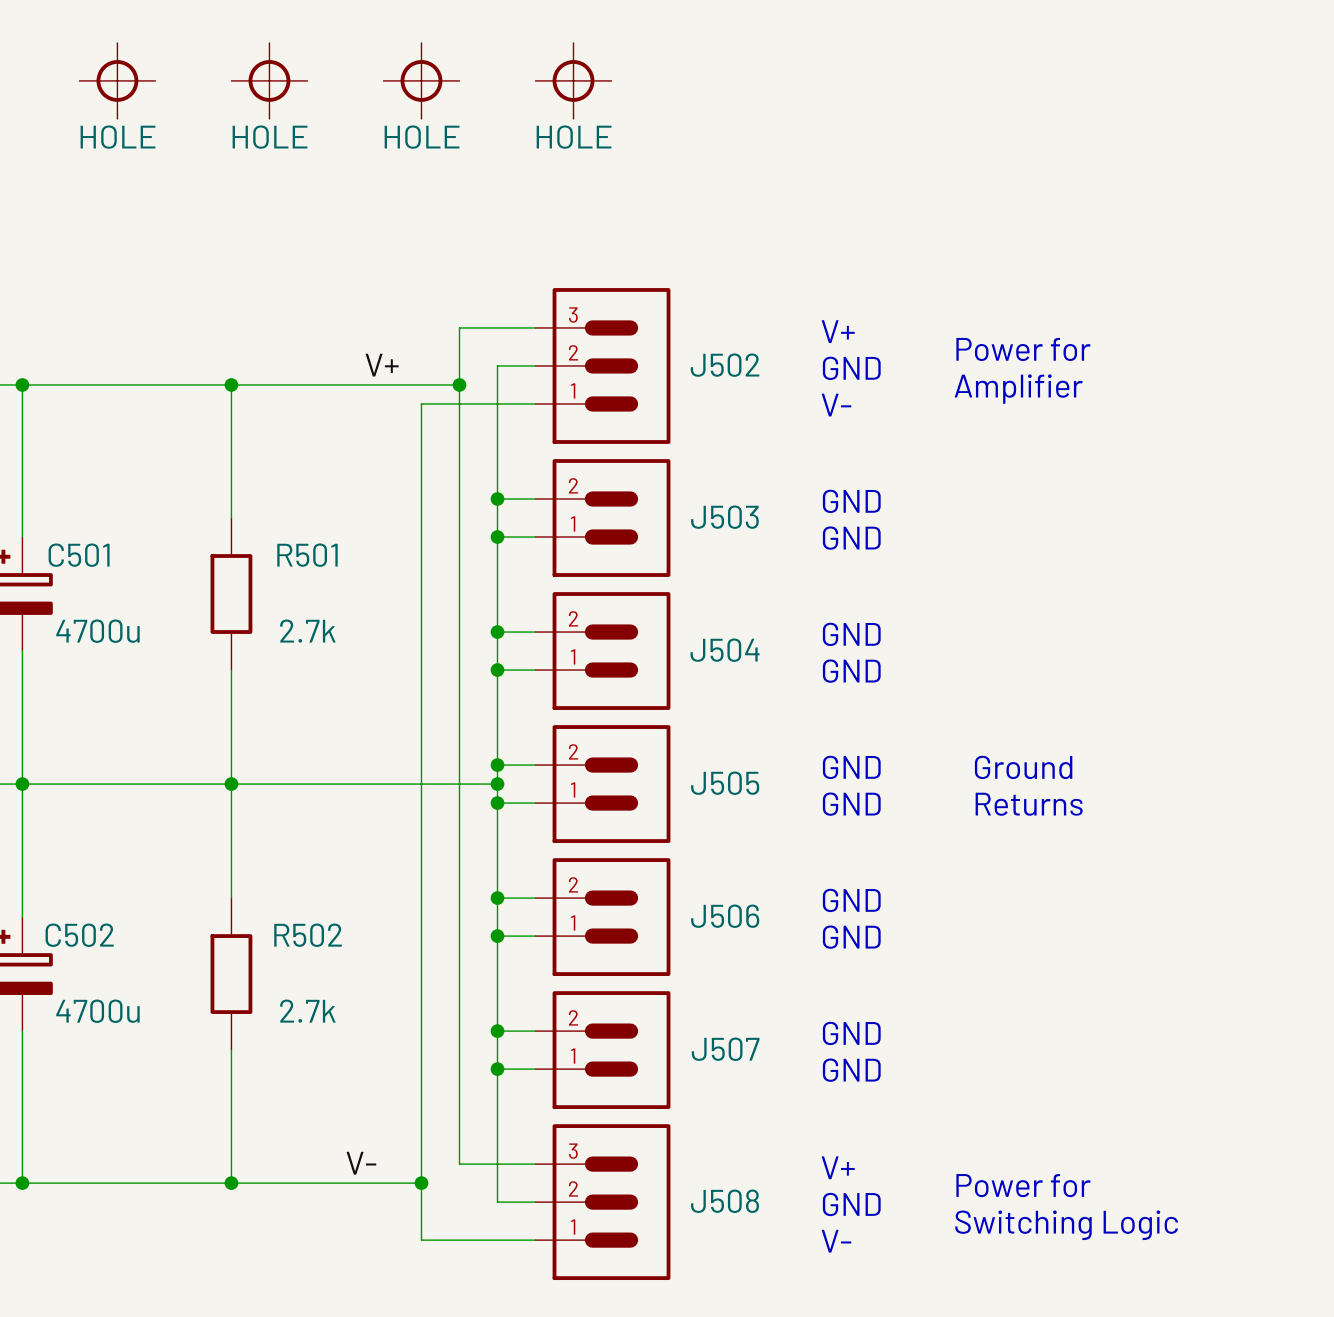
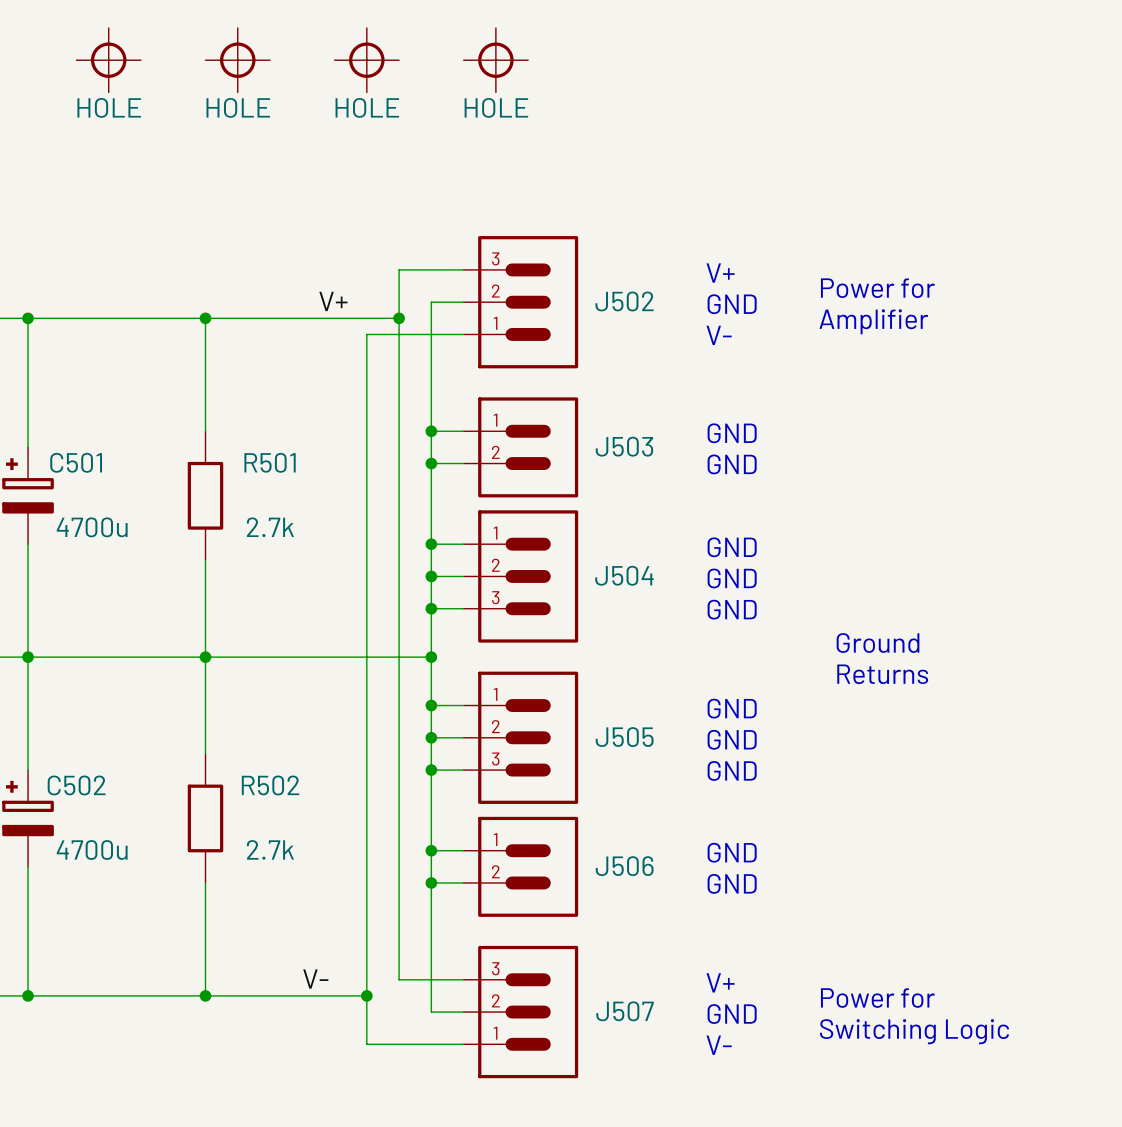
wire: (497, 499) (535, 499) -> (431, 431) (463, 431)
junction: (497, 499) -> none
text: GND (851, 501) -> none
junction: none -> (431, 431)
J503 flip: as is (611, 518) -> up-down (528, 447)
text: none -> GND (732, 433)
wire: (497, 537) (535, 537) -> (431, 463) (463, 463)
junction: (497, 537) -> none
text: GND (851, 538) -> none
junction: none -> (431, 463)
text: none -> GND (732, 464)
J504 symbol: [535, 592, 671, 710] -> [463, 510, 579, 643]
wire: (497, 632) (535, 632) -> (431, 544) (463, 544)
junction: (497, 632) -> none
text: GND (851, 634) -> none
junction: none -> (431, 544)
text: none -> GND (732, 547)
wire: (497, 670) (535, 670) -> (431, 576) (463, 576)
junction: (497, 670) -> none
text: GND (851, 671) -> none
junction: none -> (431, 576)
text: none -> GND (732, 578)
J505 symbol: [535, 725, 671, 843] -> [463, 671, 579, 804]
junction: none -> (431, 608)
wire: (497, 765) (535, 765) -> (431, 705) (463, 705)
junction: (497, 765) -> none
text position: GND (851, 767) -> GND (732, 609)
wire: (497, 803) (535, 803) -> (431, 608) (463, 608)
junction: (497, 803) -> none
text position: GND (851, 804) -> GND (732, 708)
junction: none -> (431, 705)
junction: none -> (431, 737)
text: none -> GND (732, 739)
wire: (497, 898) (535, 898) -> (431, 737) (463, 737)
junction: (497, 898) -> none
text: GND (851, 900) -> none
junction: none -> (431, 770)
J506 position: (602, 917) -> (520, 866)
J506 flip: as is (611, 917) -> up-down (528, 866)
text: none -> GND (732, 770)
wire: (497, 936) (535, 936) -> (431, 770) (463, 770)
junction: (497, 936) -> none
text: GND (851, 937) -> none
junction: none -> (431, 850)
text: none -> GND (732, 852)
wire: (497, 1031) (535, 1031) -> (431, 850) (463, 850)
junction: (497, 1031) -> none
text: GND (851, 1033) -> none
junction: none -> (431, 882)
J507: (602, 1050) -> none
text: none -> GND (732, 883)
wire: (497, 1069) (535, 1069) -> (431, 882) (463, 882)
junction: (497, 1069) -> none
text: GND (851, 1070) -> none
J508 name: J508 (725, 1201) -> J507 (625, 1011)

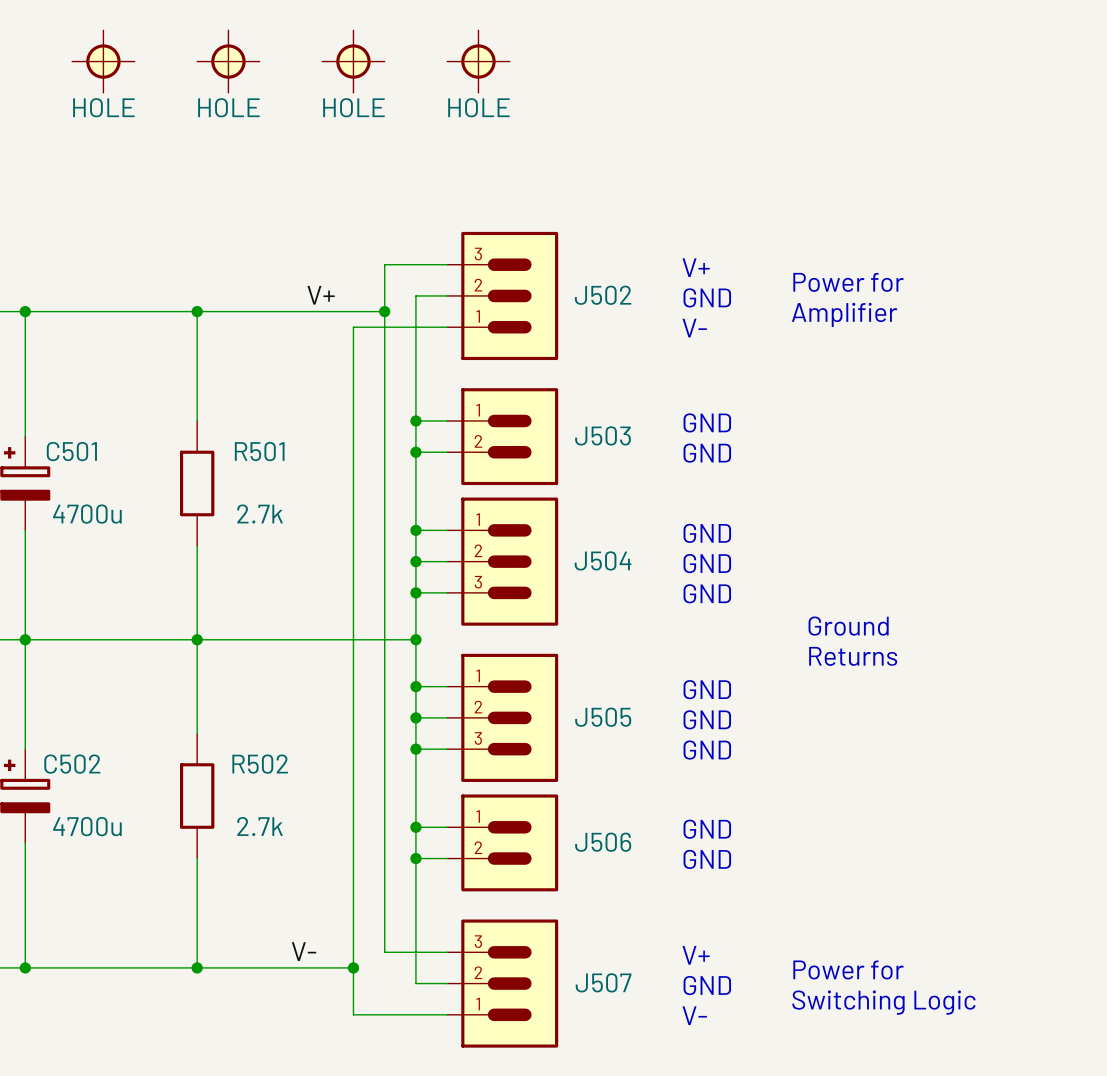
part symbol: [76, 27, 141, 93] -> [72, 30, 135, 93]
part symbol: [205, 27, 271, 93] -> [197, 30, 260, 93]
part symbol: [334, 27, 400, 93] -> [322, 30, 385, 93]
part symbol: [463, 27, 529, 93] -> [447, 30, 510, 93]
J502 symbol: [463, 236, 579, 369] -> [447, 231, 559, 361]
J503 symbol: [463, 397, 579, 498] -> [447, 388, 559, 486]
J504 symbol: [463, 510, 579, 643] -> [447, 497, 559, 626]
J505 symbol: [463, 671, 579, 804] -> [447, 653, 559, 782]
J506 symbol: [463, 816, 579, 917] -> [447, 794, 559, 892]
J507 symbol: [463, 945, 579, 1079] -> [447, 919, 559, 1048]

